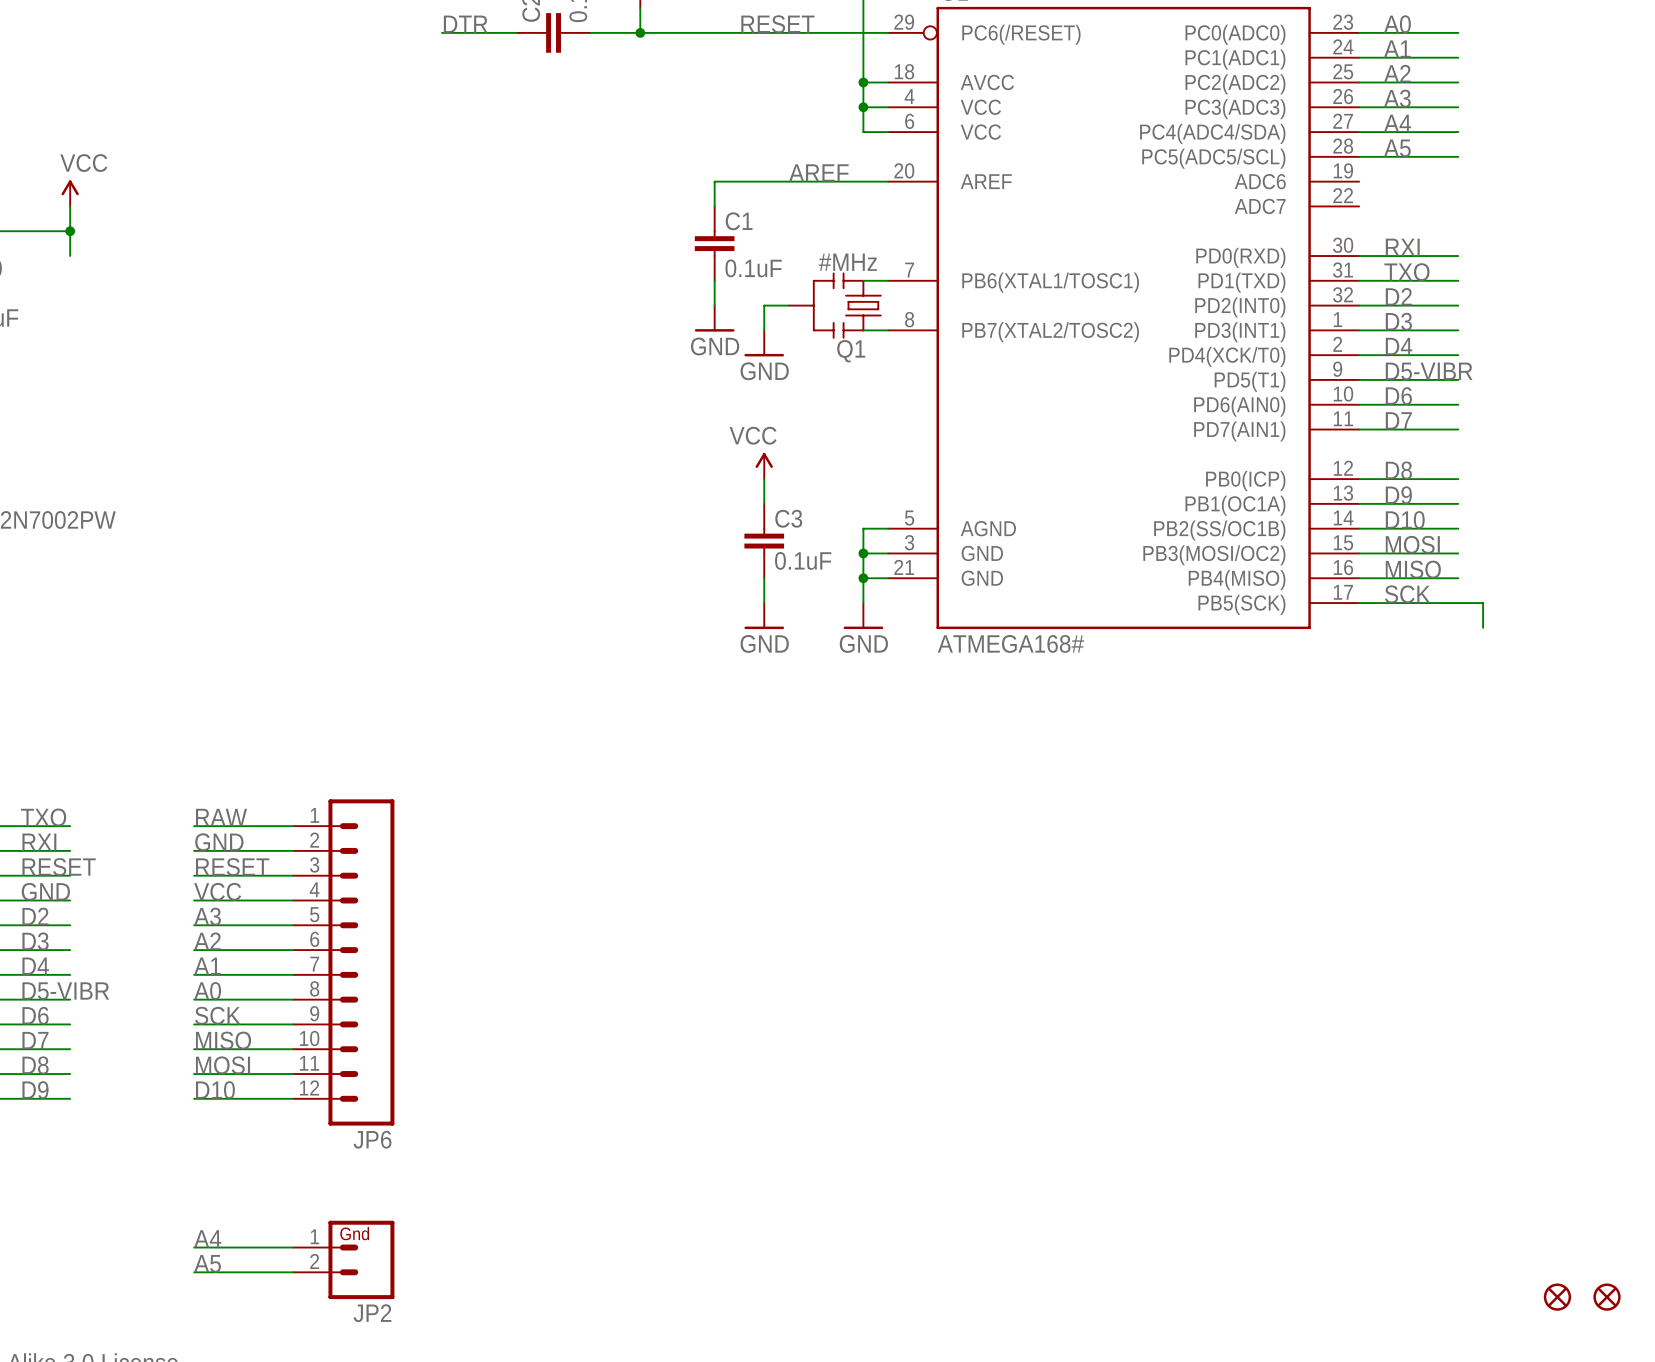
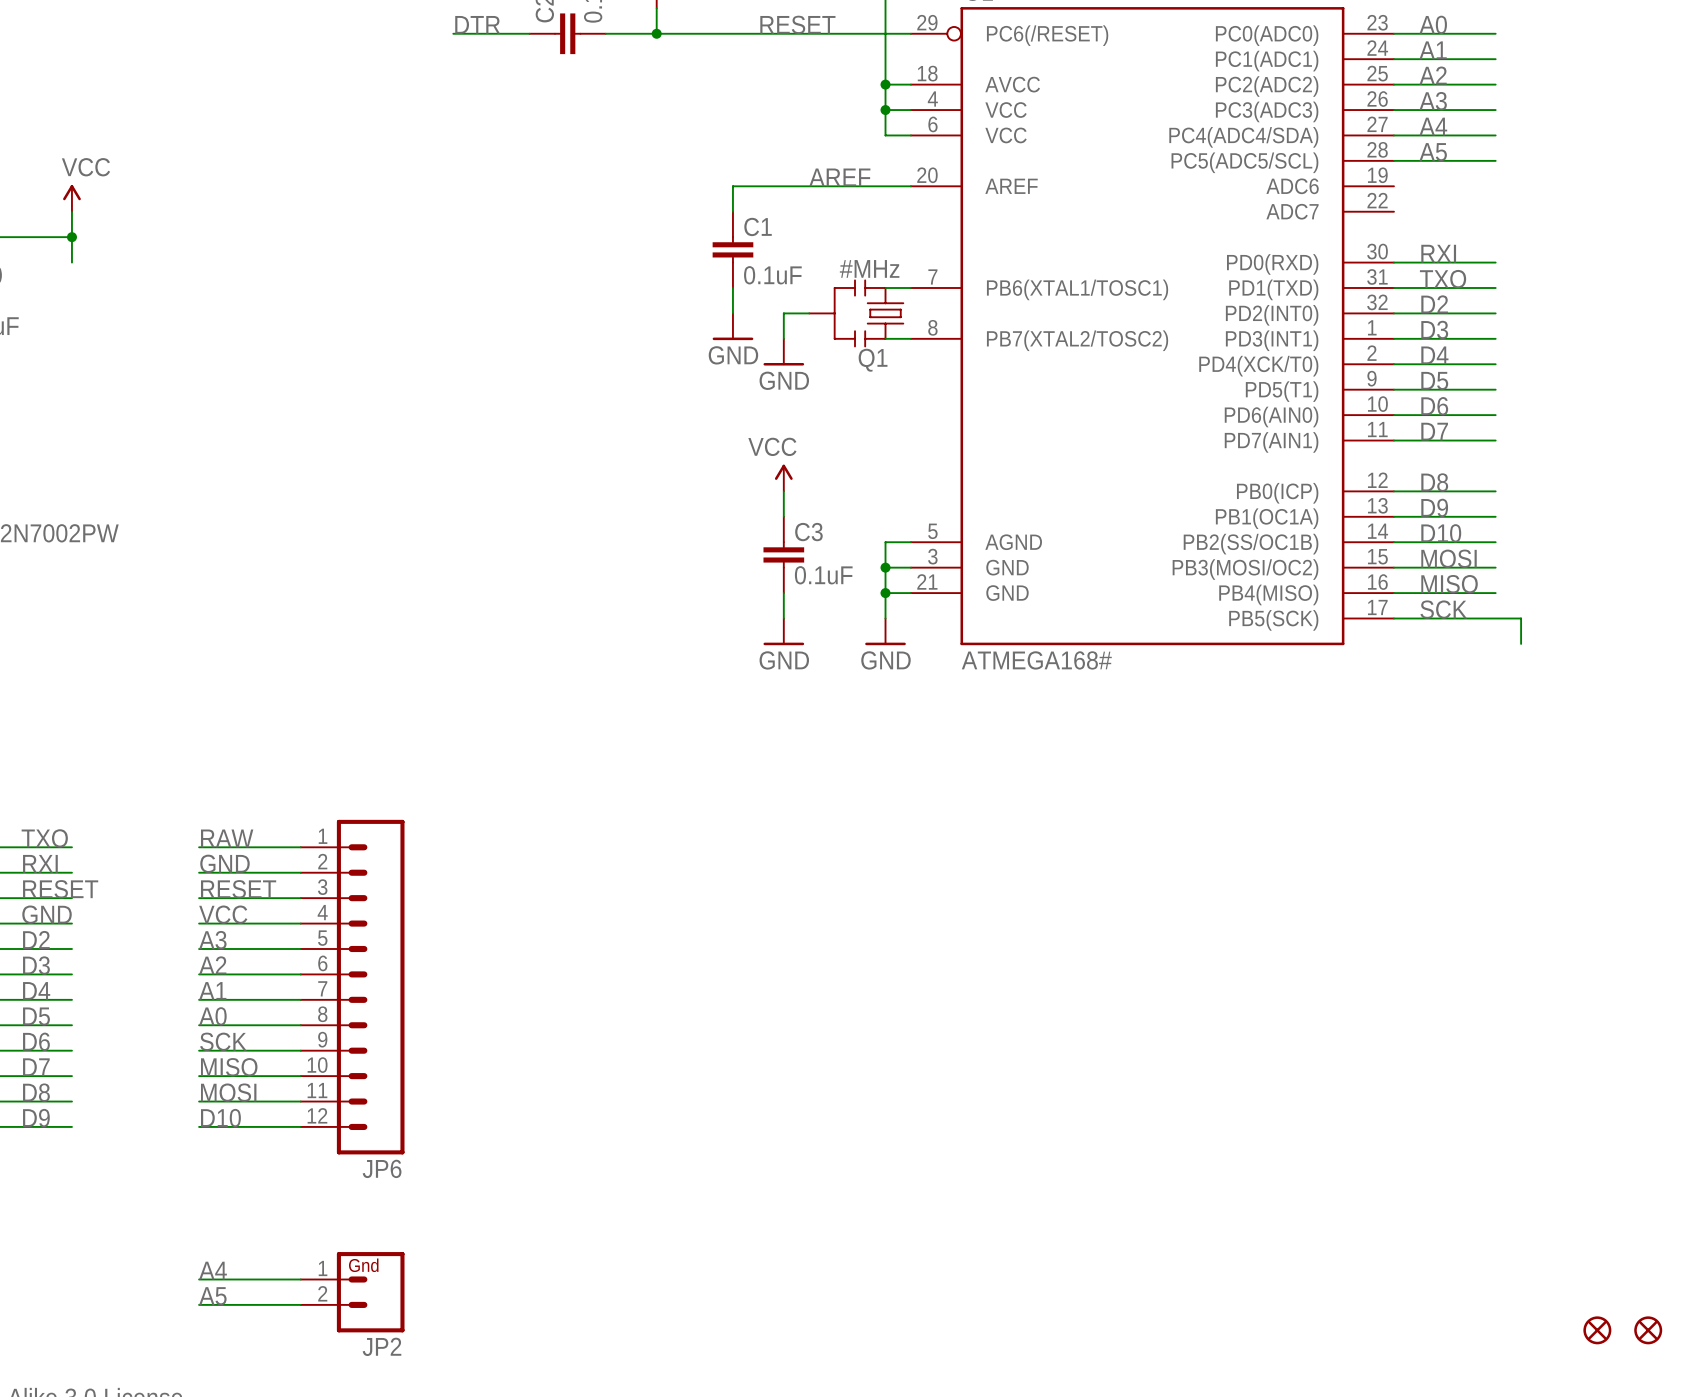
label: D5-VIBR (1429, 371) -> D5 (1434, 380)
label: D5-VIBR (65, 991) -> D5 (36, 1016)

